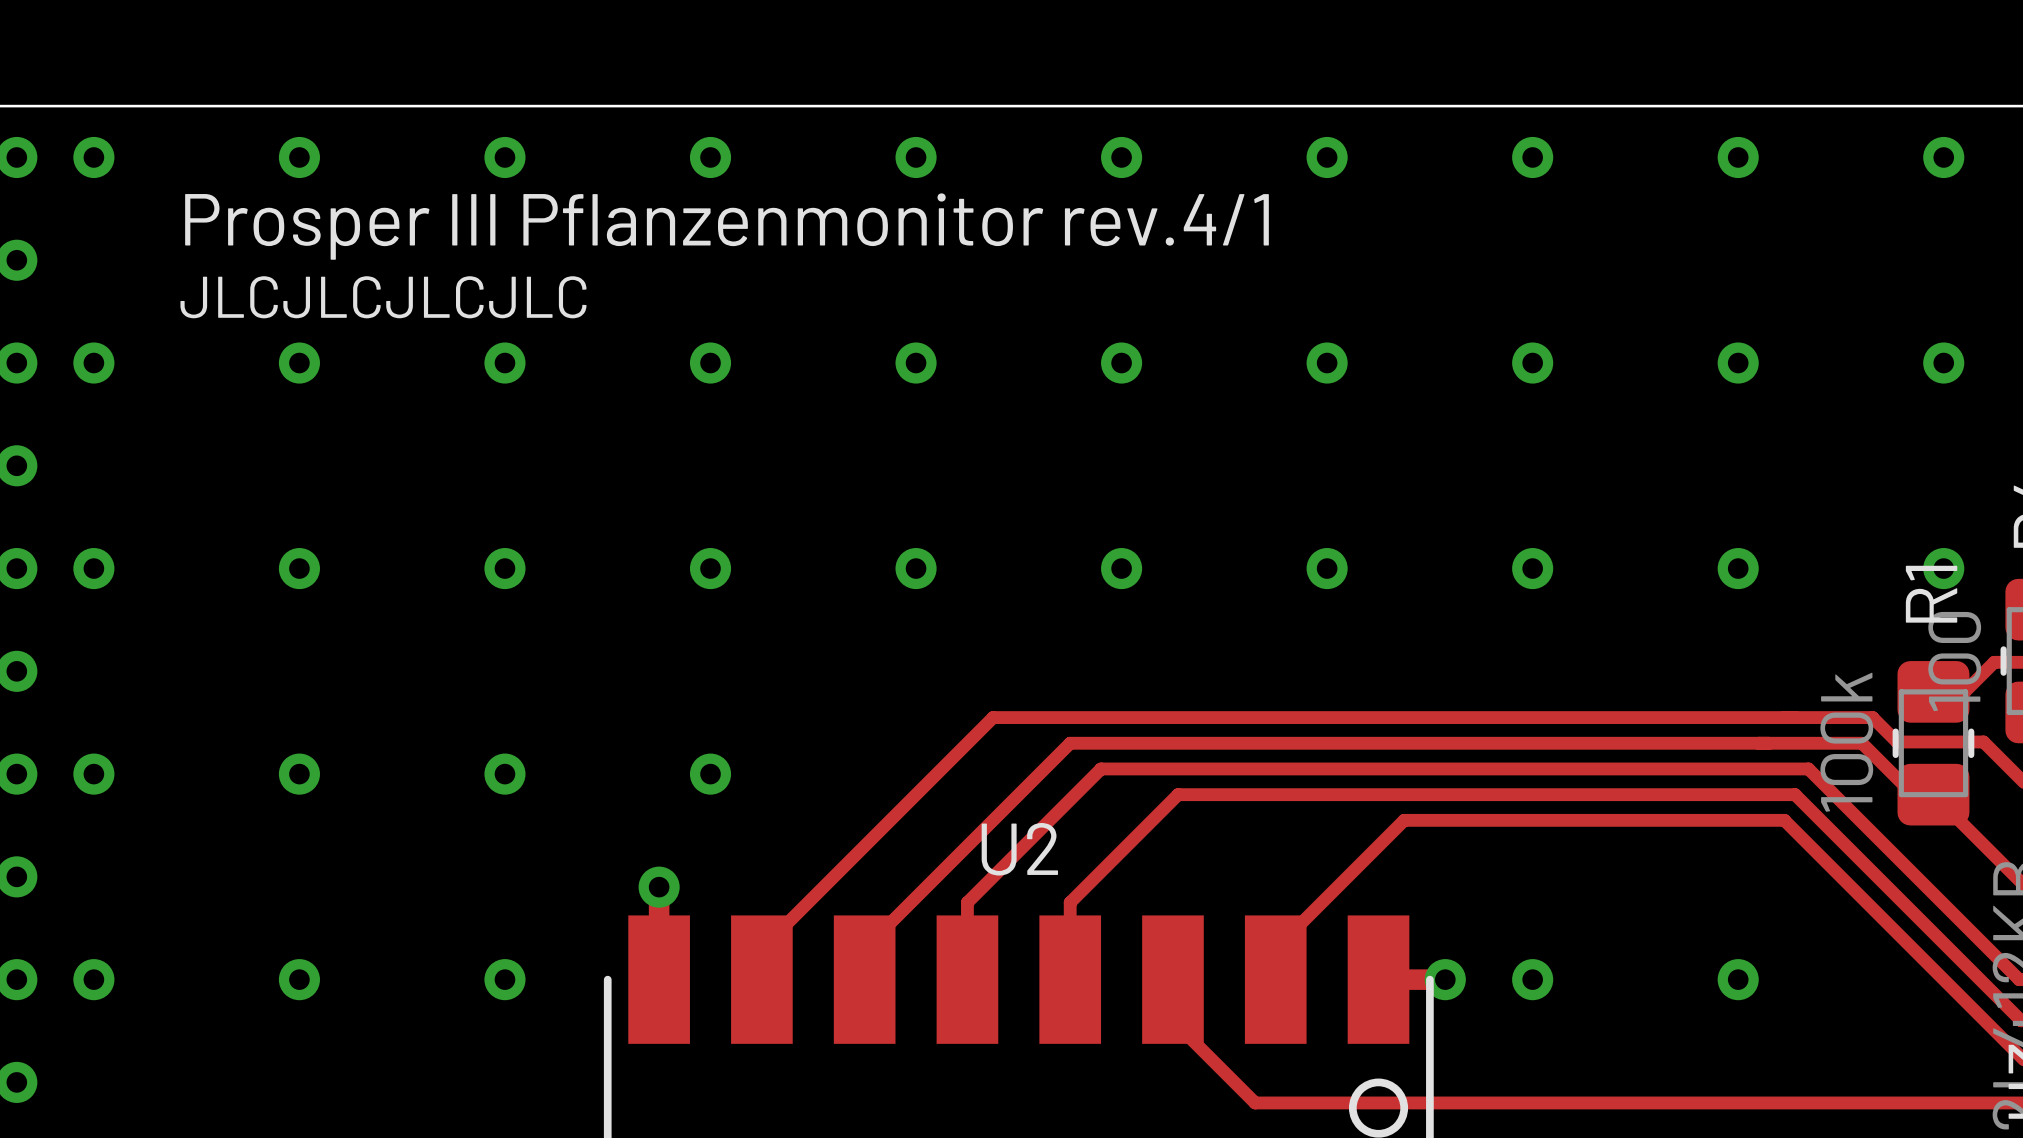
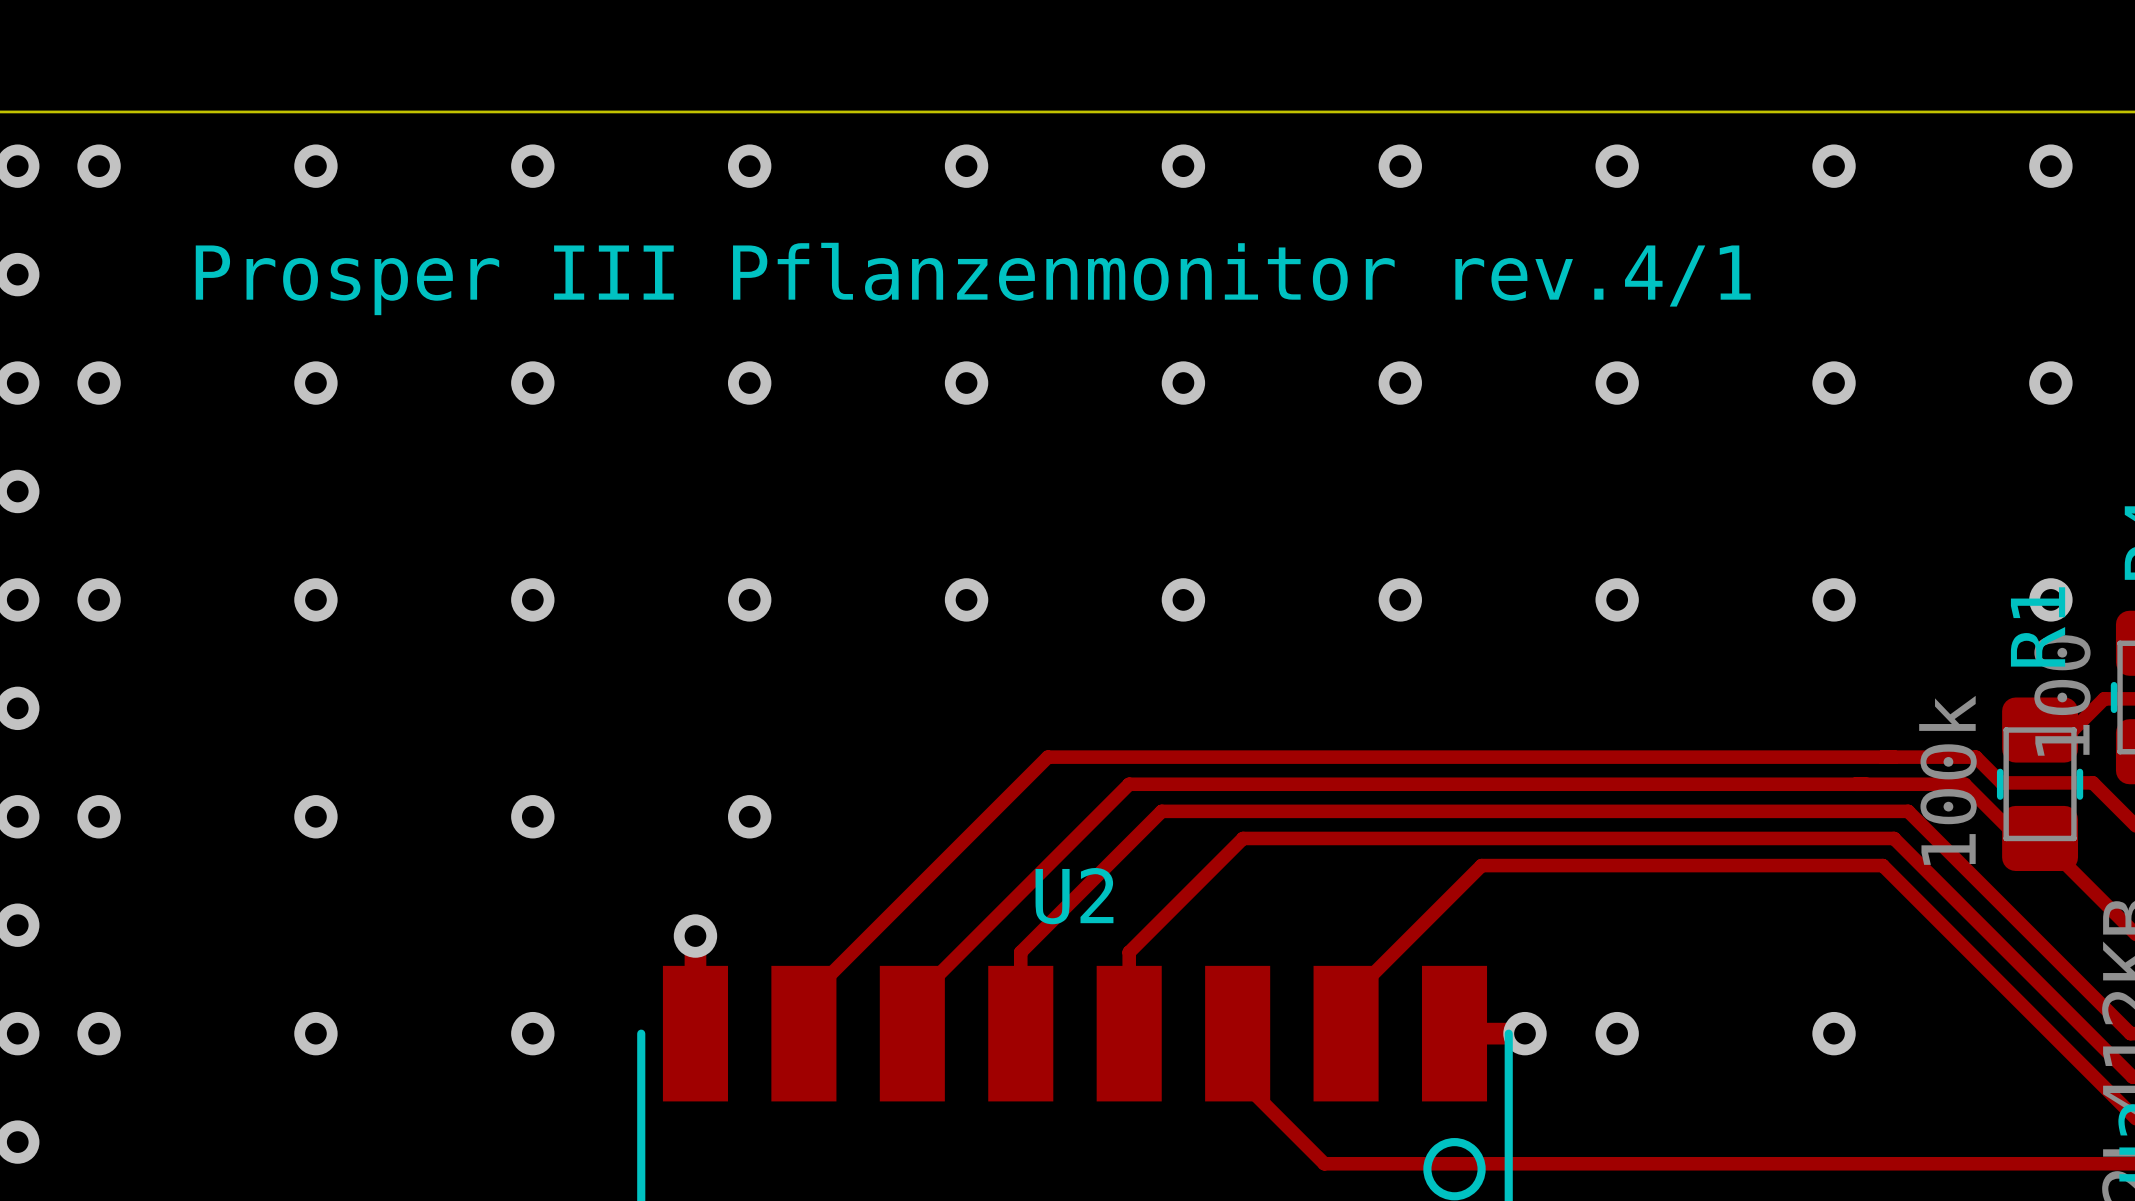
text position: Prosper III Pflanzenmonitor rev.4/1 (726, 226) -> Prosper III Pflanzenmonitor rev.4/1 (973, 278)
text: JLCJLCJLCJLC (383, 297) -> none

